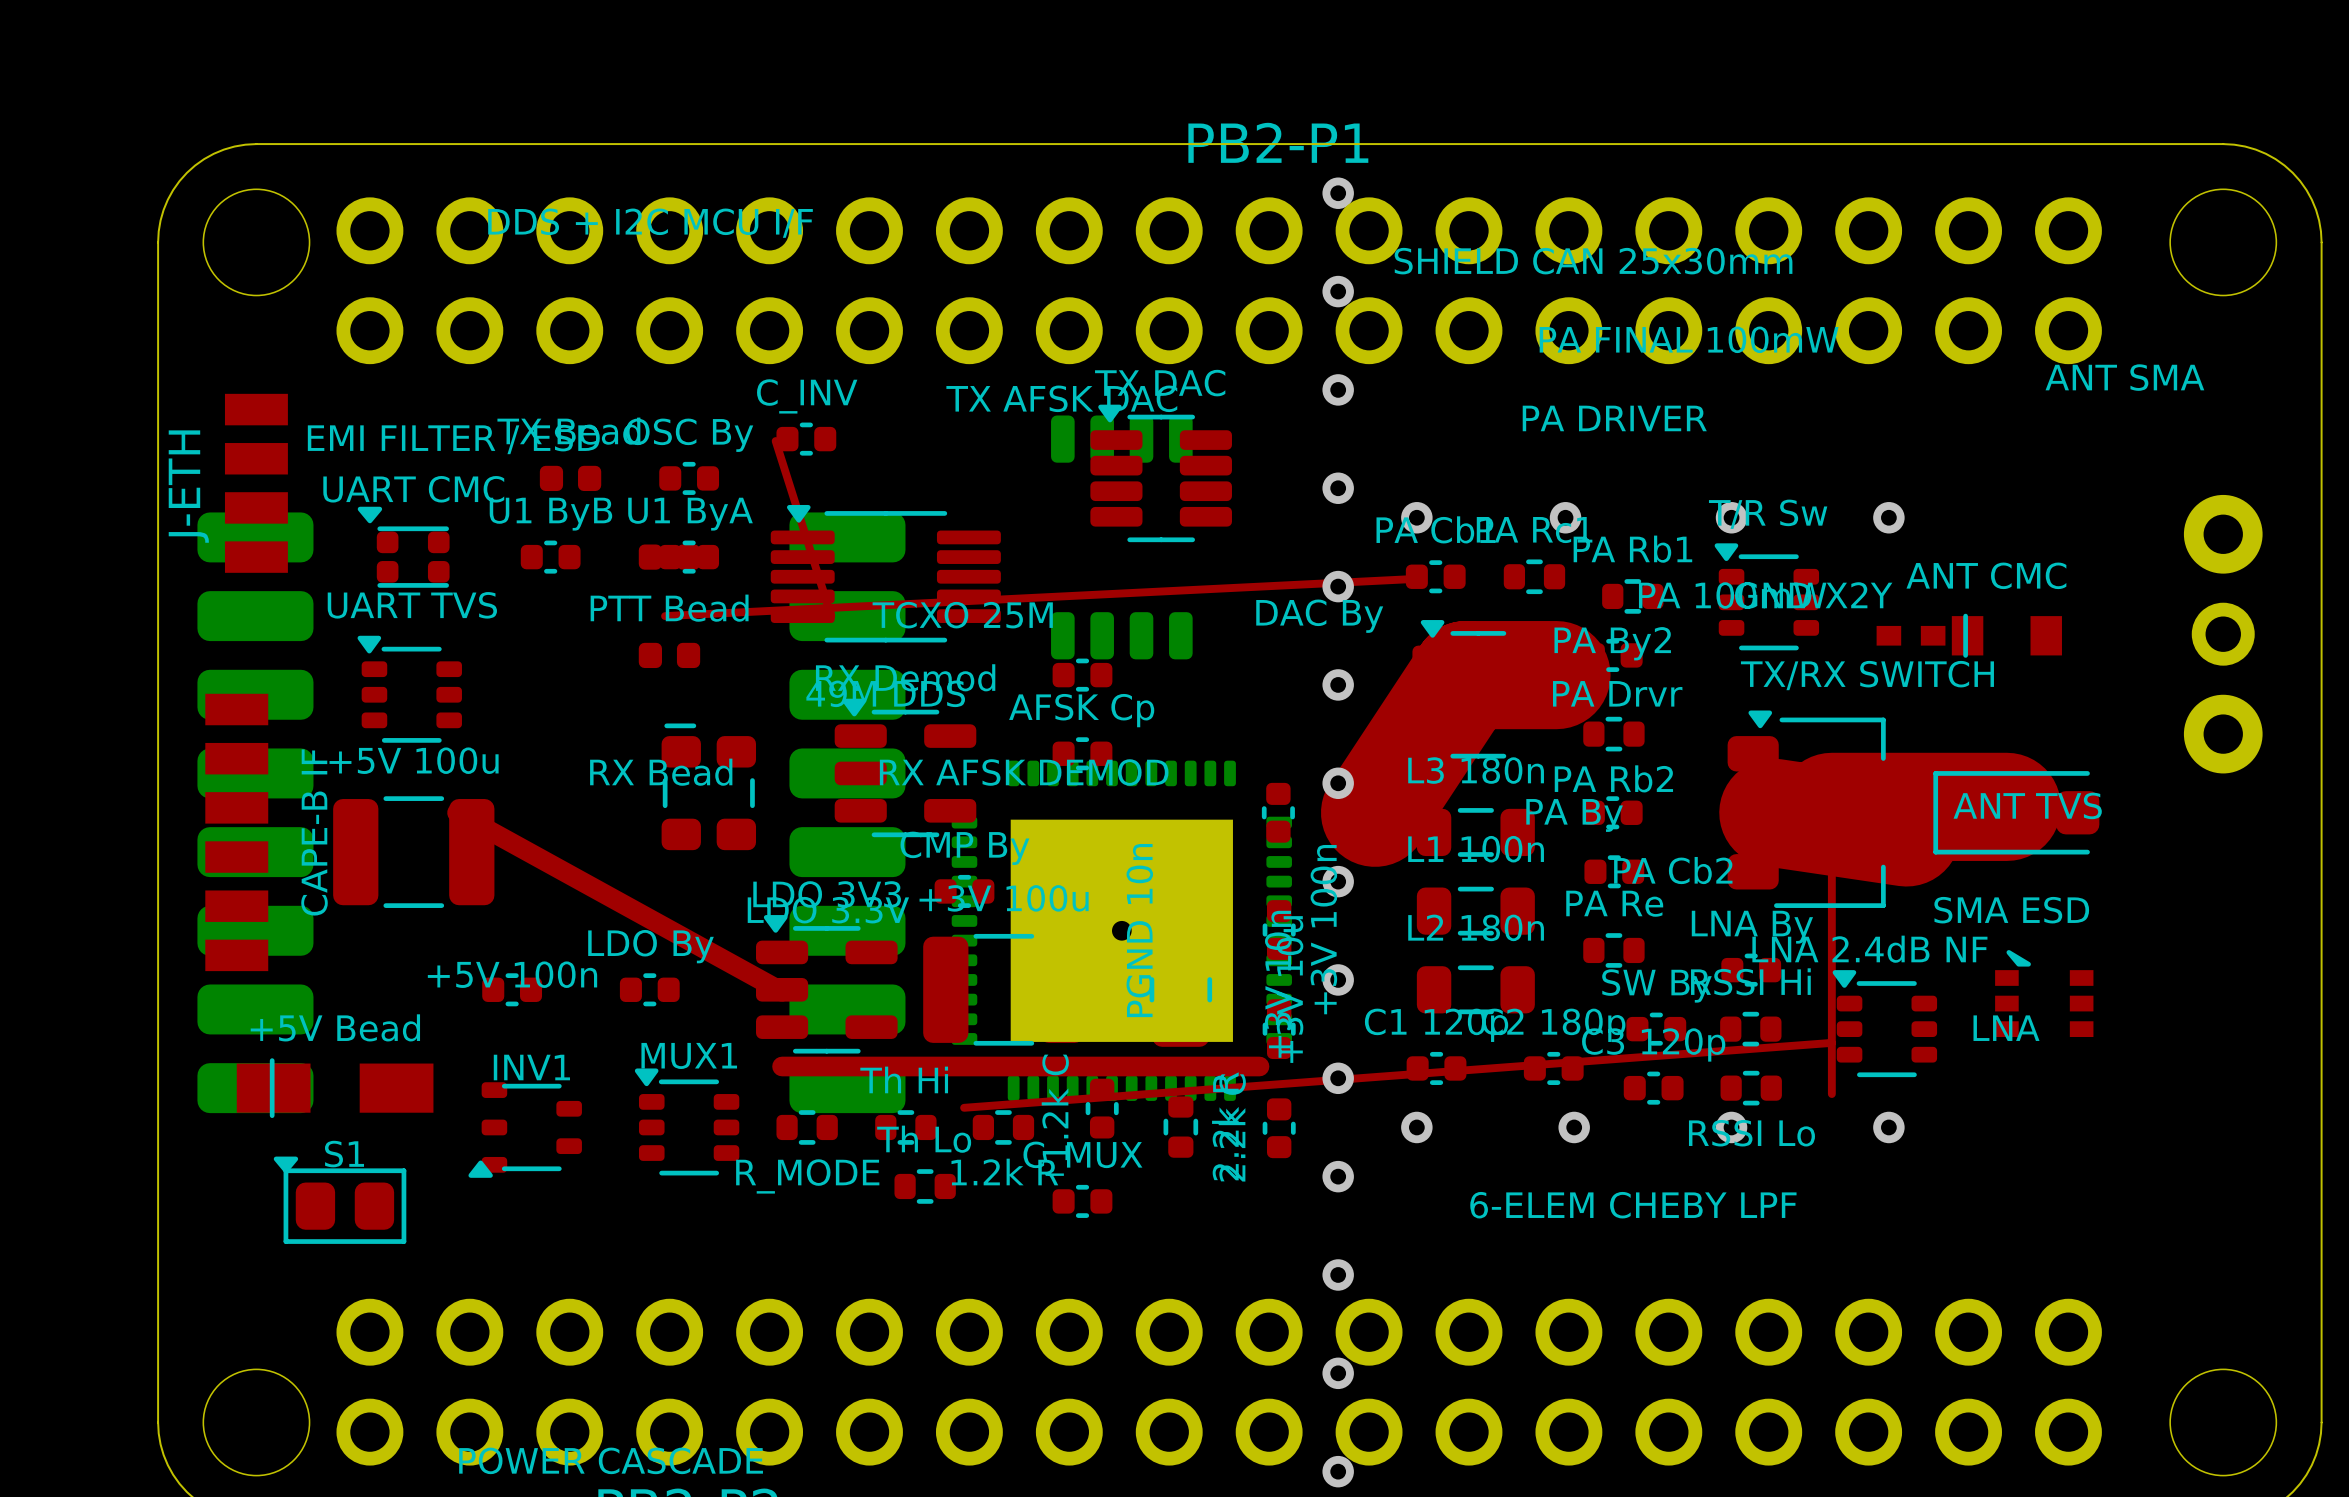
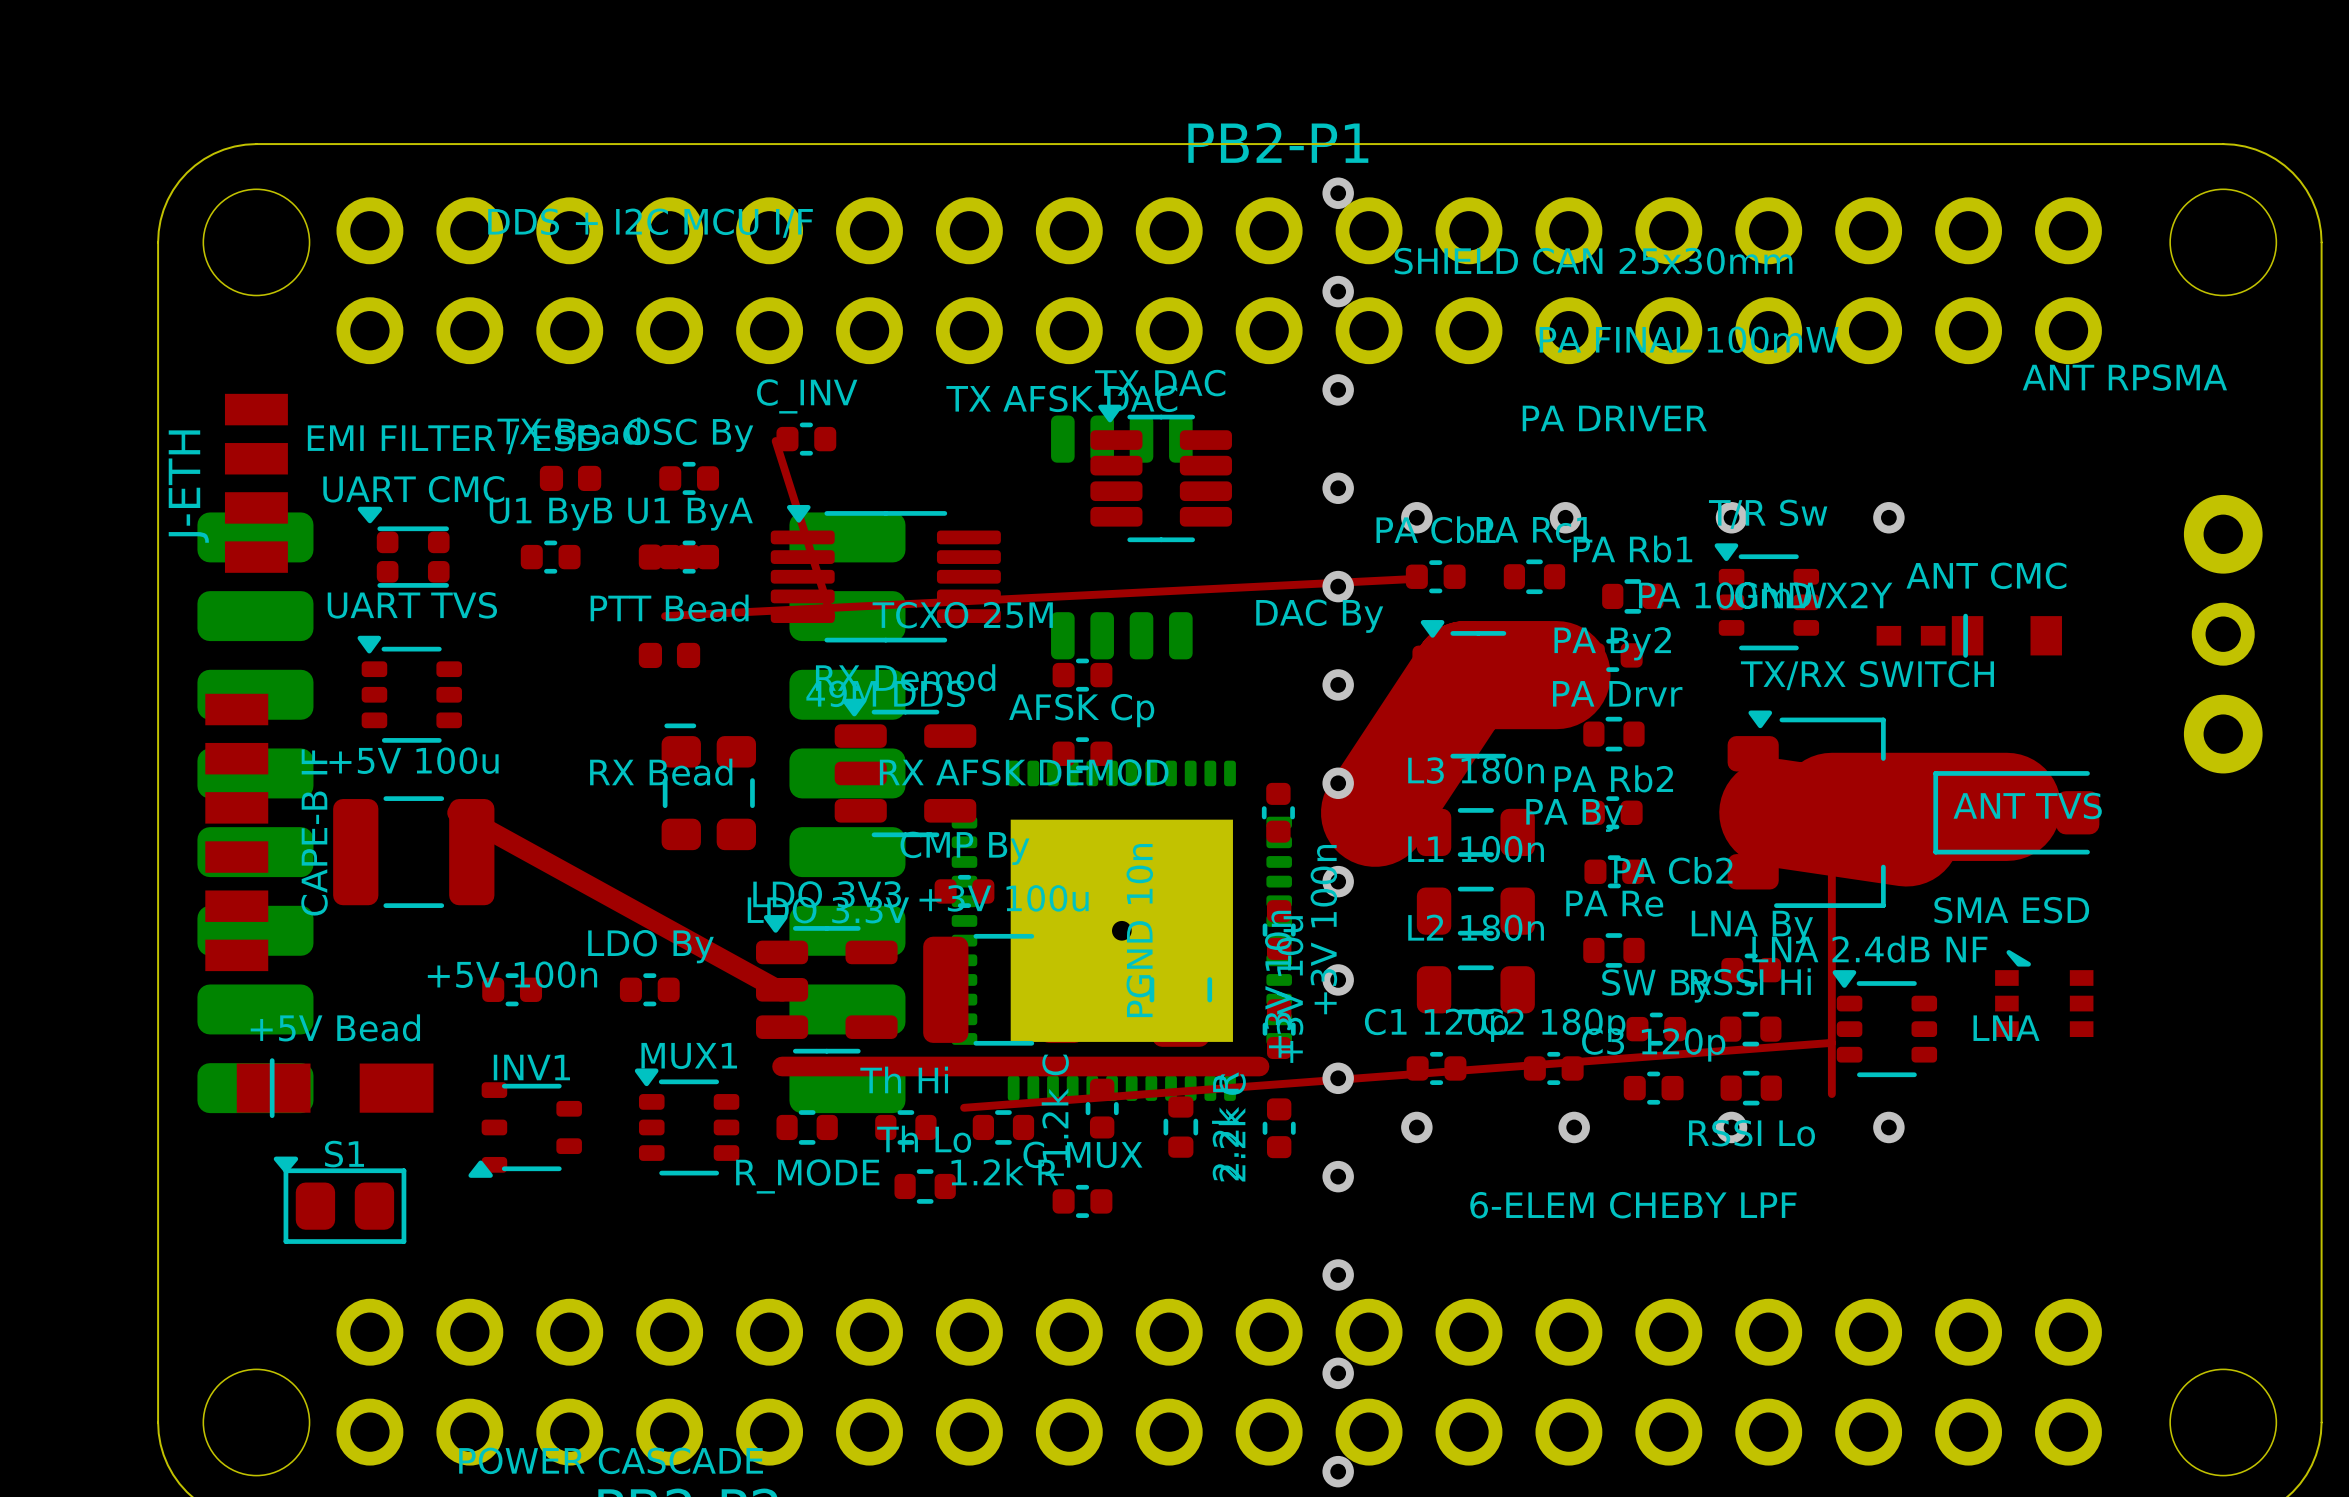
ANT SMA name: ANT SMA (2124, 377) -> ANT RPSMA (2124, 377)

